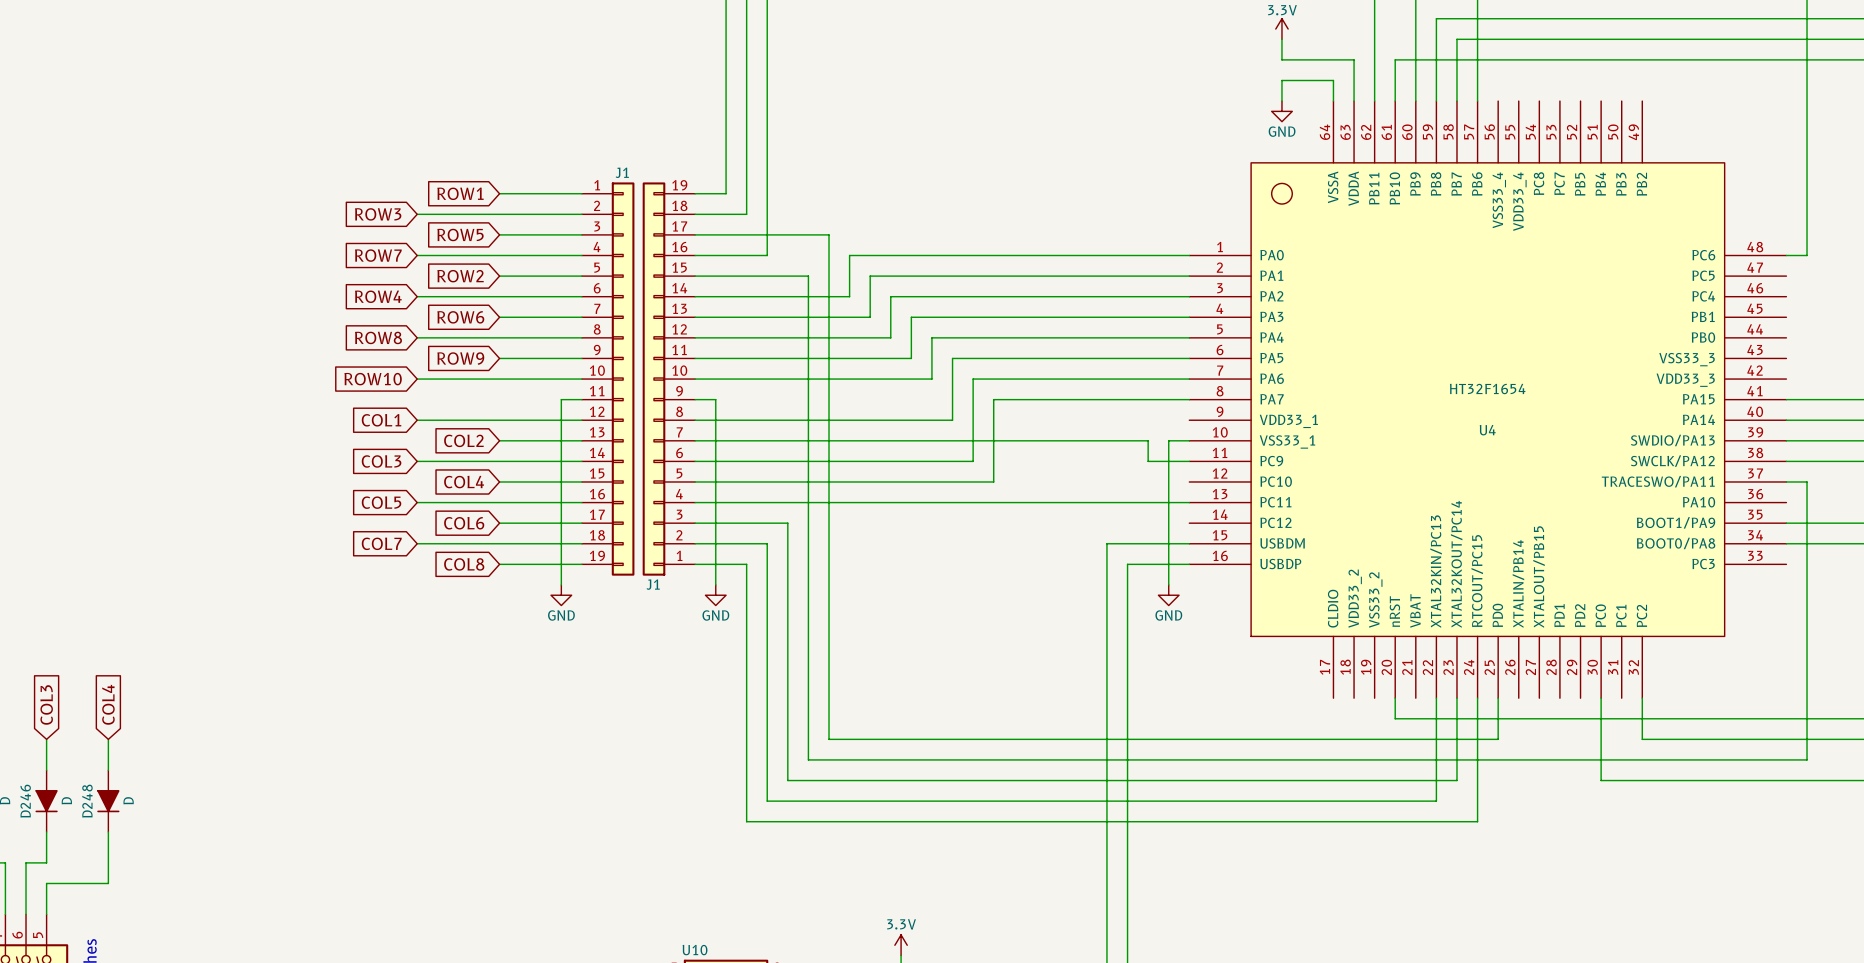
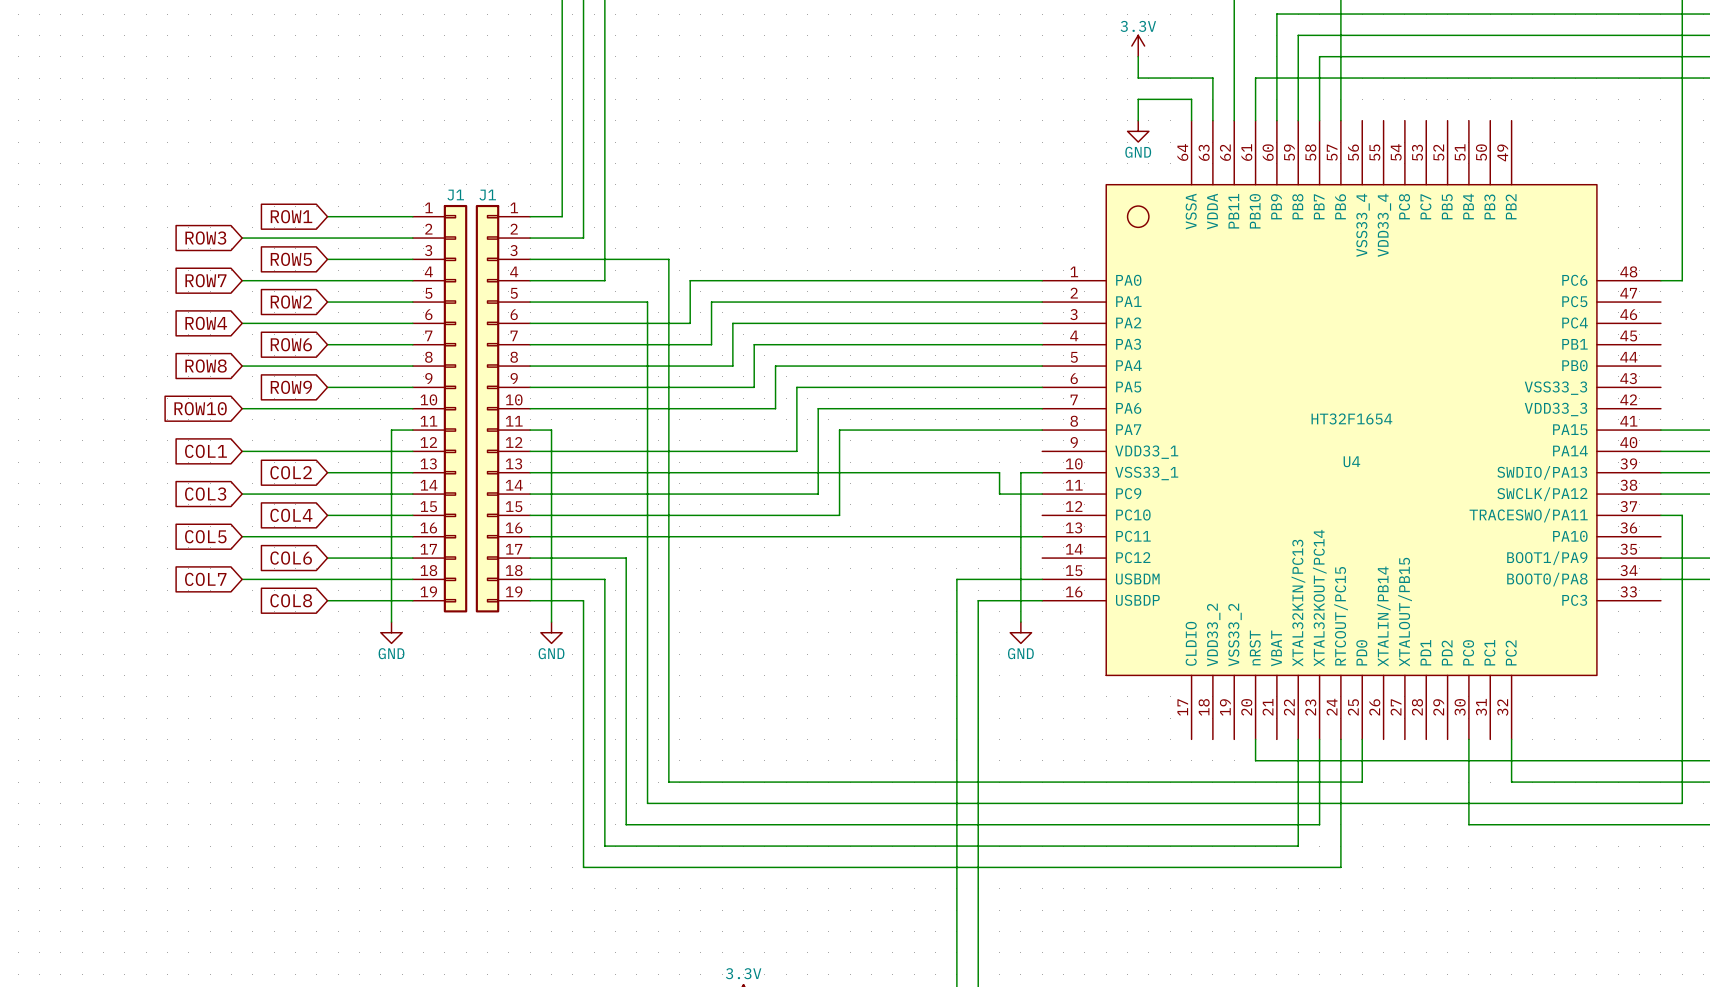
J1 flip: as is (653, 379) -> up-down (487, 408)

